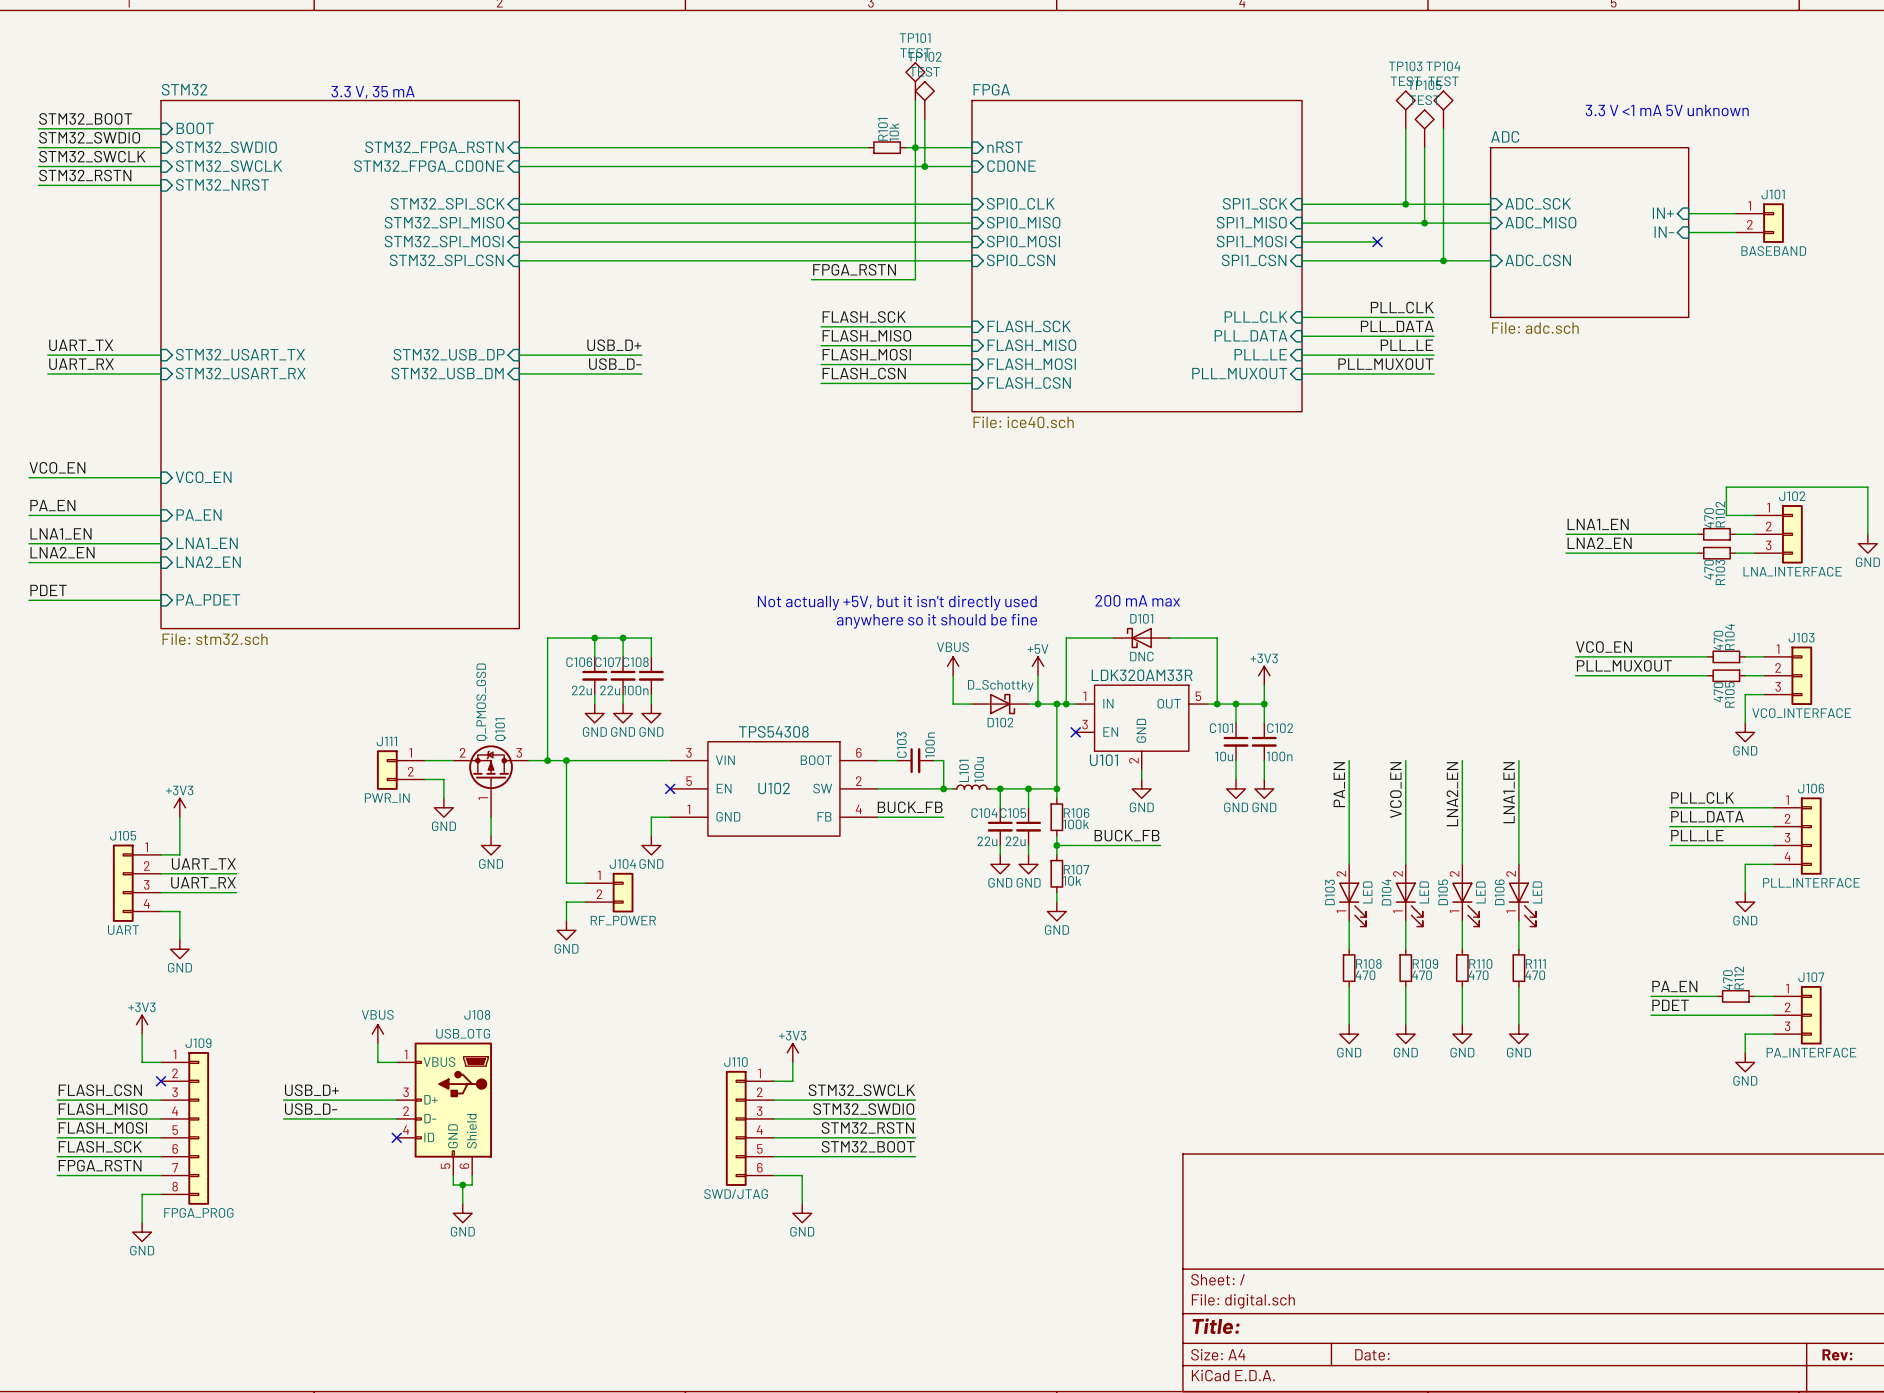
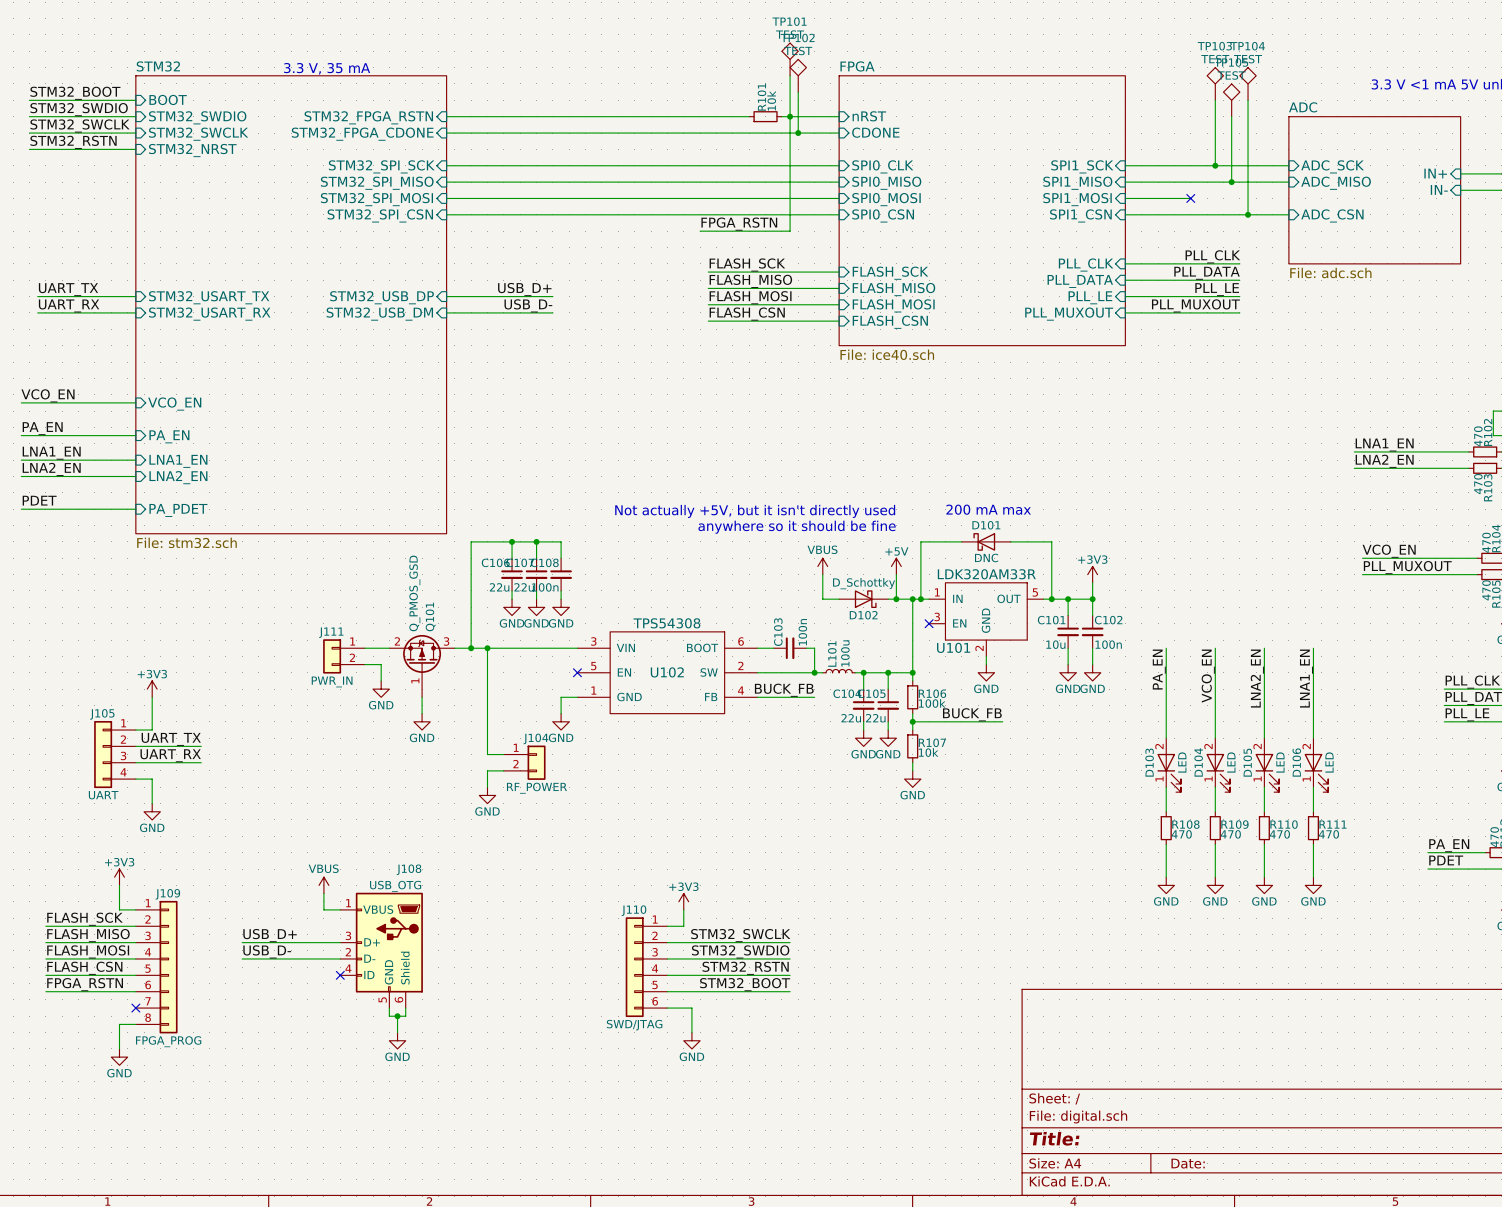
label: none -> FLASH_SCK (85, 919)
no-connect mark: (160, 1081) -> none
label: FLASH_CSN (100, 1090) -> FLASH_MISO (88, 935)
label: FLASH_MISO (103, 1109) -> FLASH_MOSI (88, 951)
label: FLASH_MOSI (102, 1127) -> FLASH_CSN (84, 968)
label: FLASH_SCK (100, 1146) -> FPGA_RSTN (85, 984)
label: FPGA_RSTN (100, 1165) -> none
wire: (57, 1175) (160, 1175) -> (45, 926) (135, 926)
no-connect mark: none -> (135, 1008)

